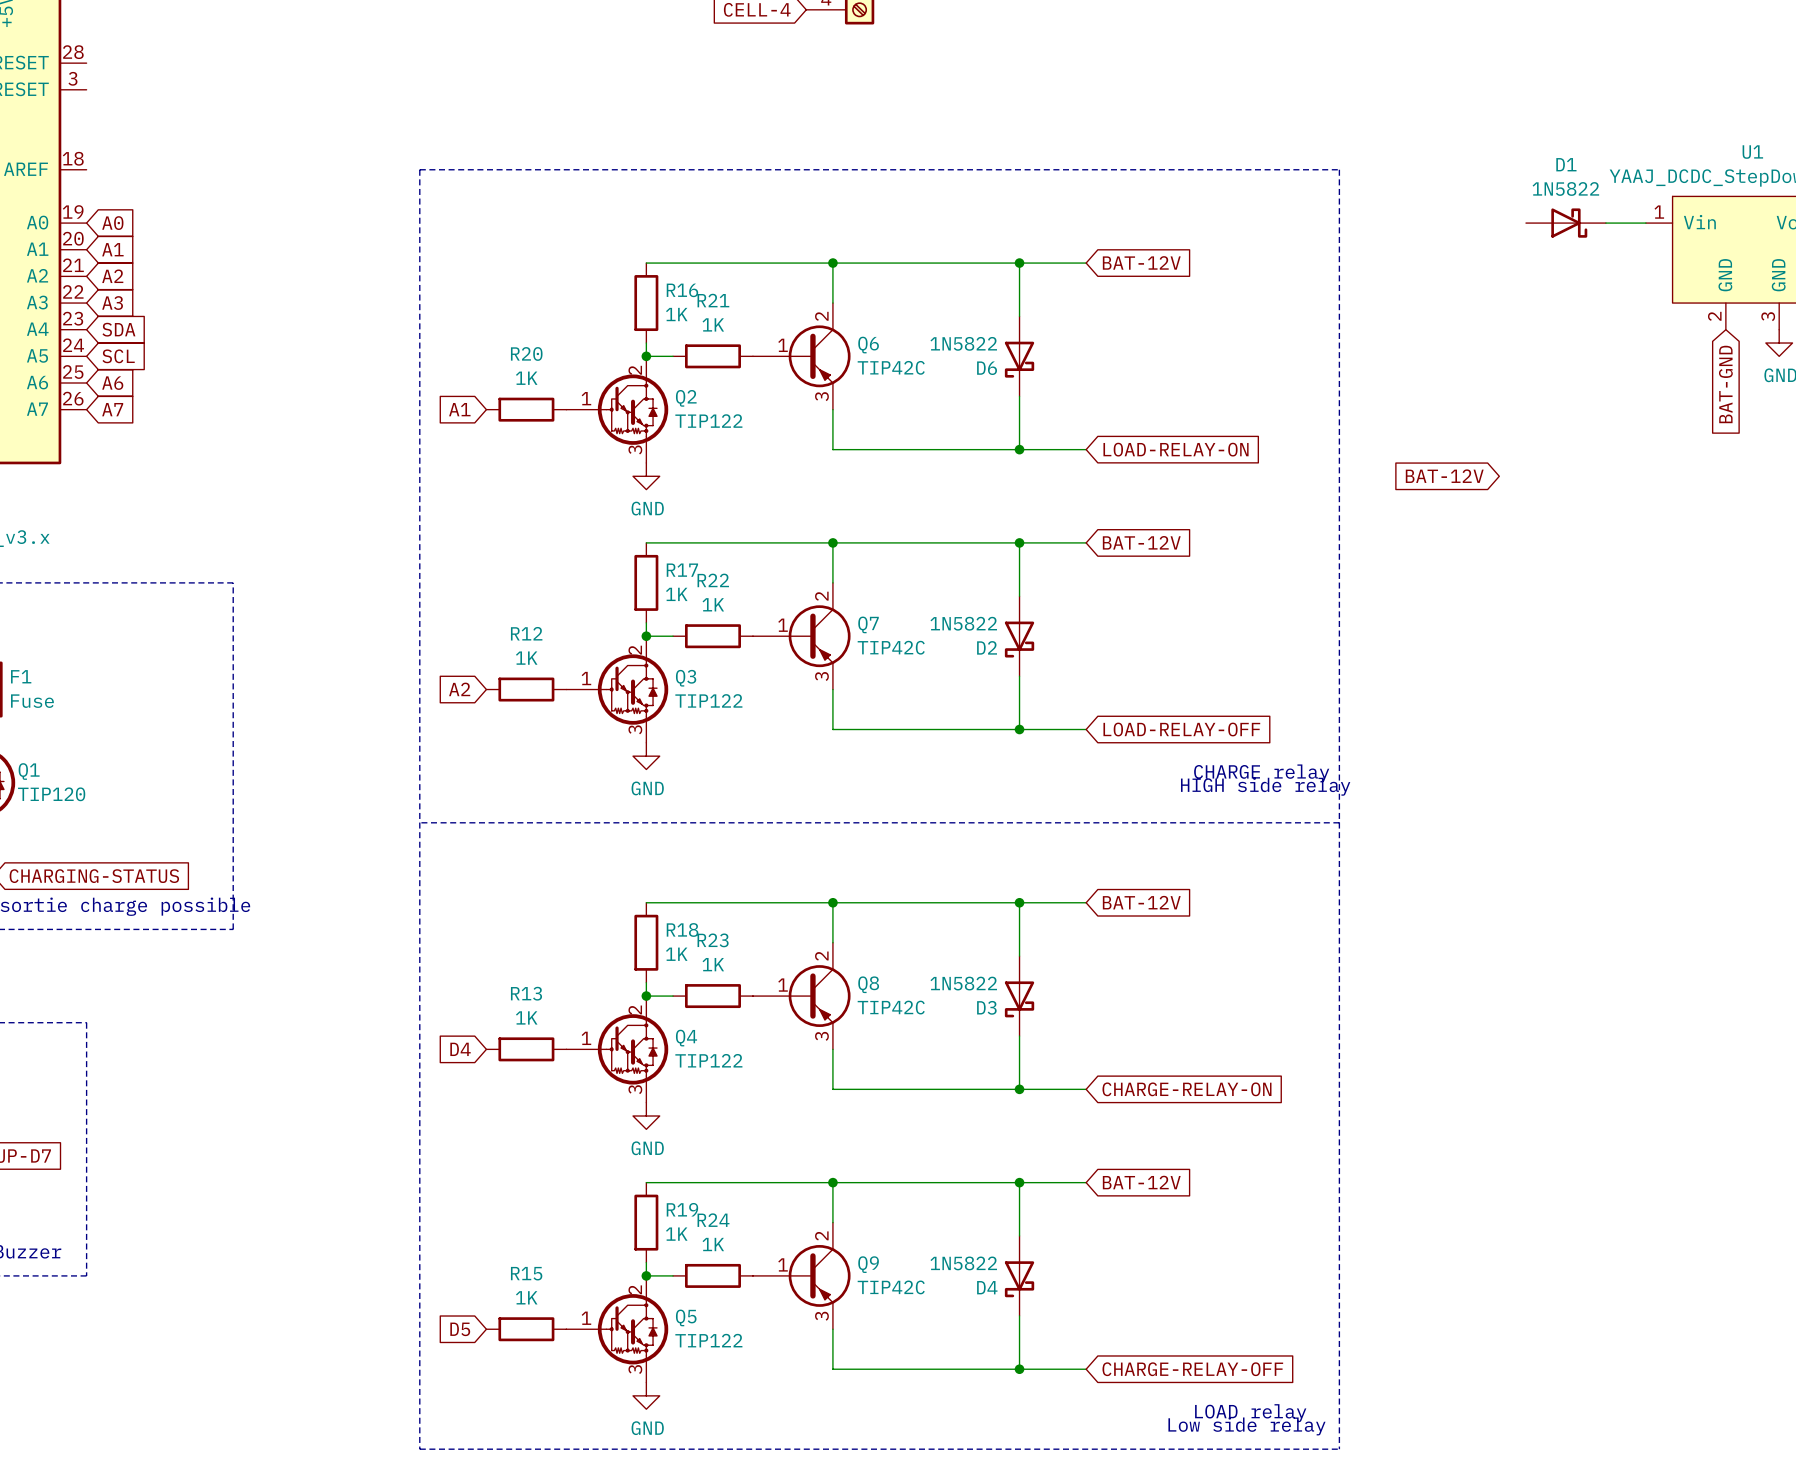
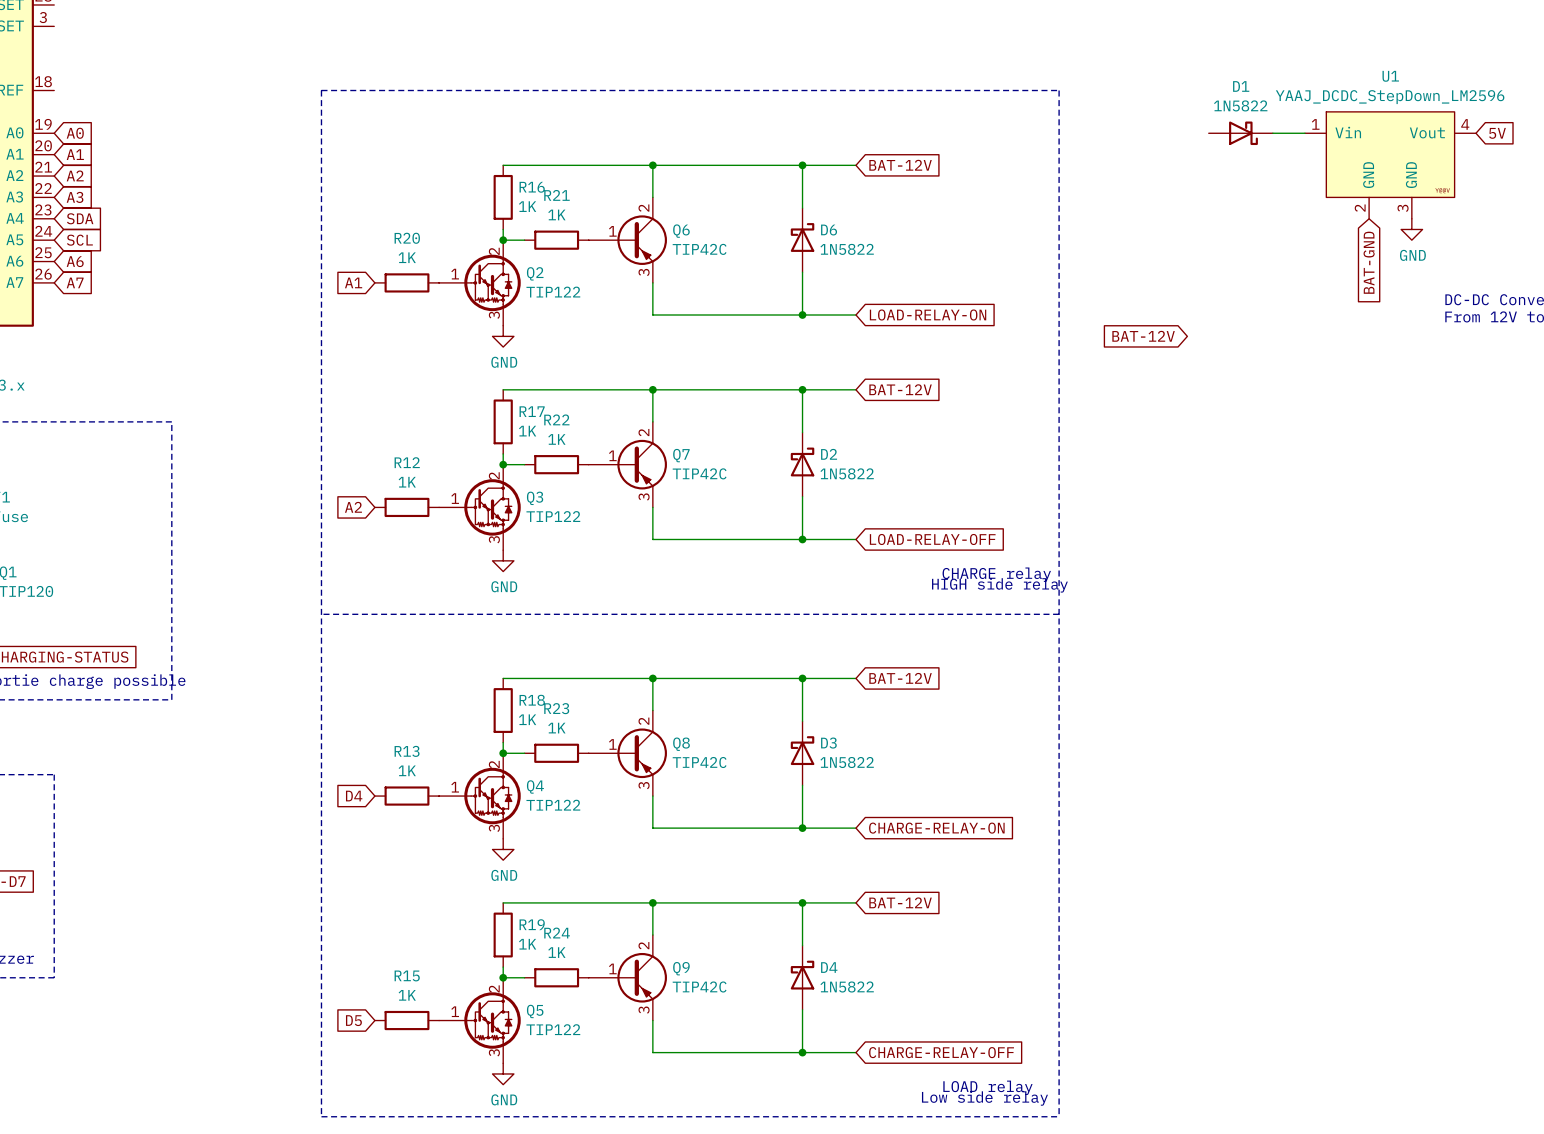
D6 rotation: 0° (1019, 359) -> 180° (802, 237)
D2 rotation: 0° (1019, 639) -> 180° (802, 461)
D3 rotation: 0° (1019, 999) -> 180° (802, 750)
D4 rotation: 0° (1019, 1279) -> 180° (802, 975)

